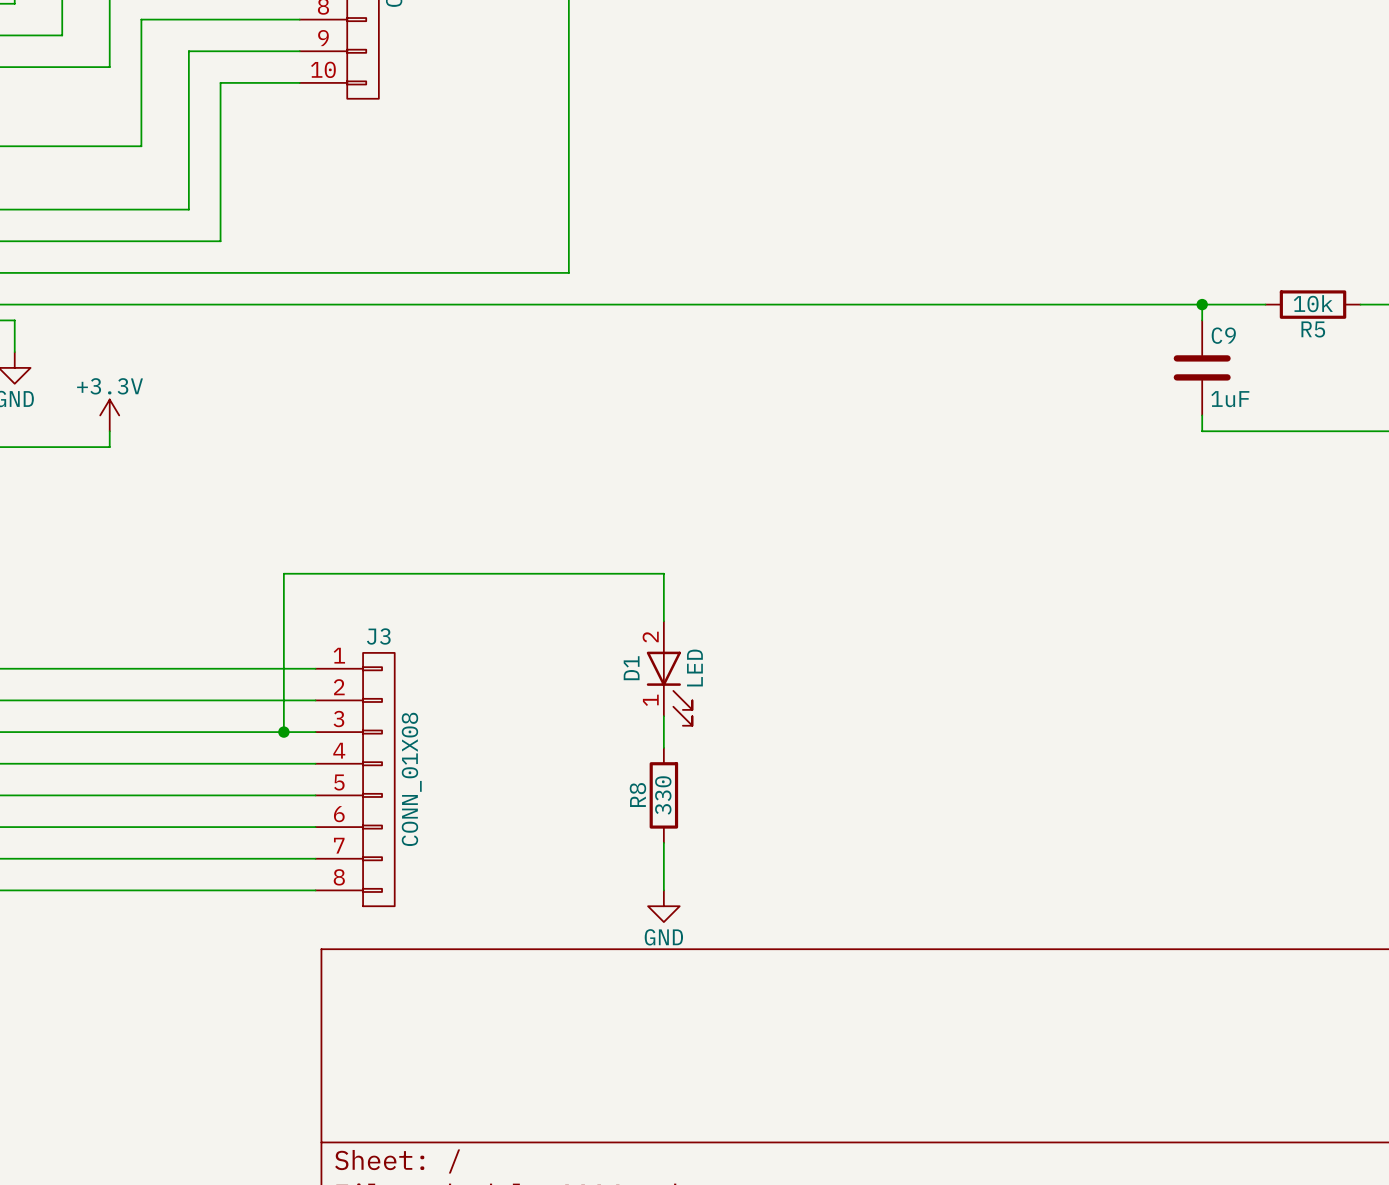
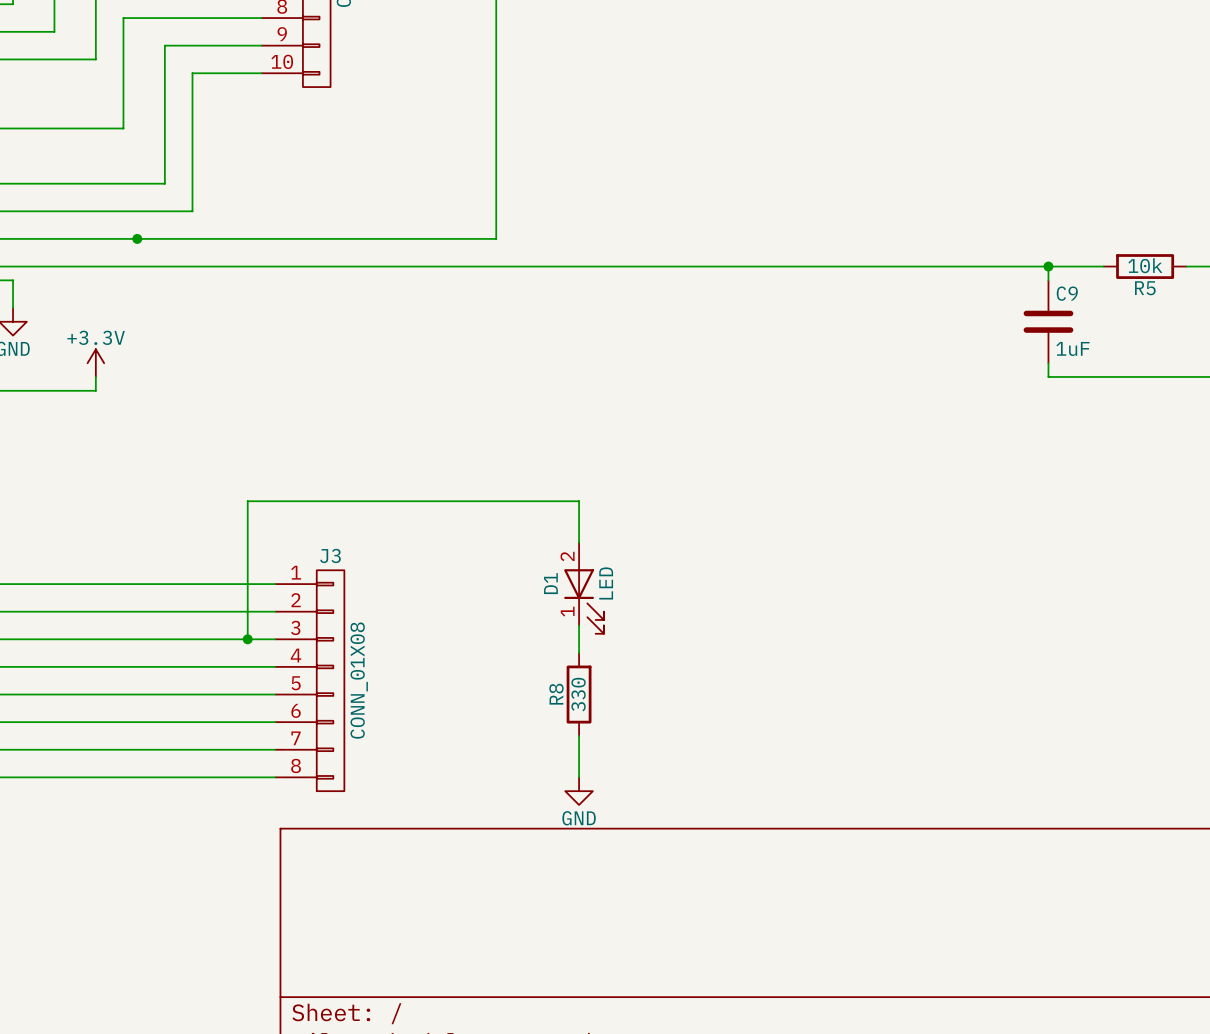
junction: none -> (137, 238)

